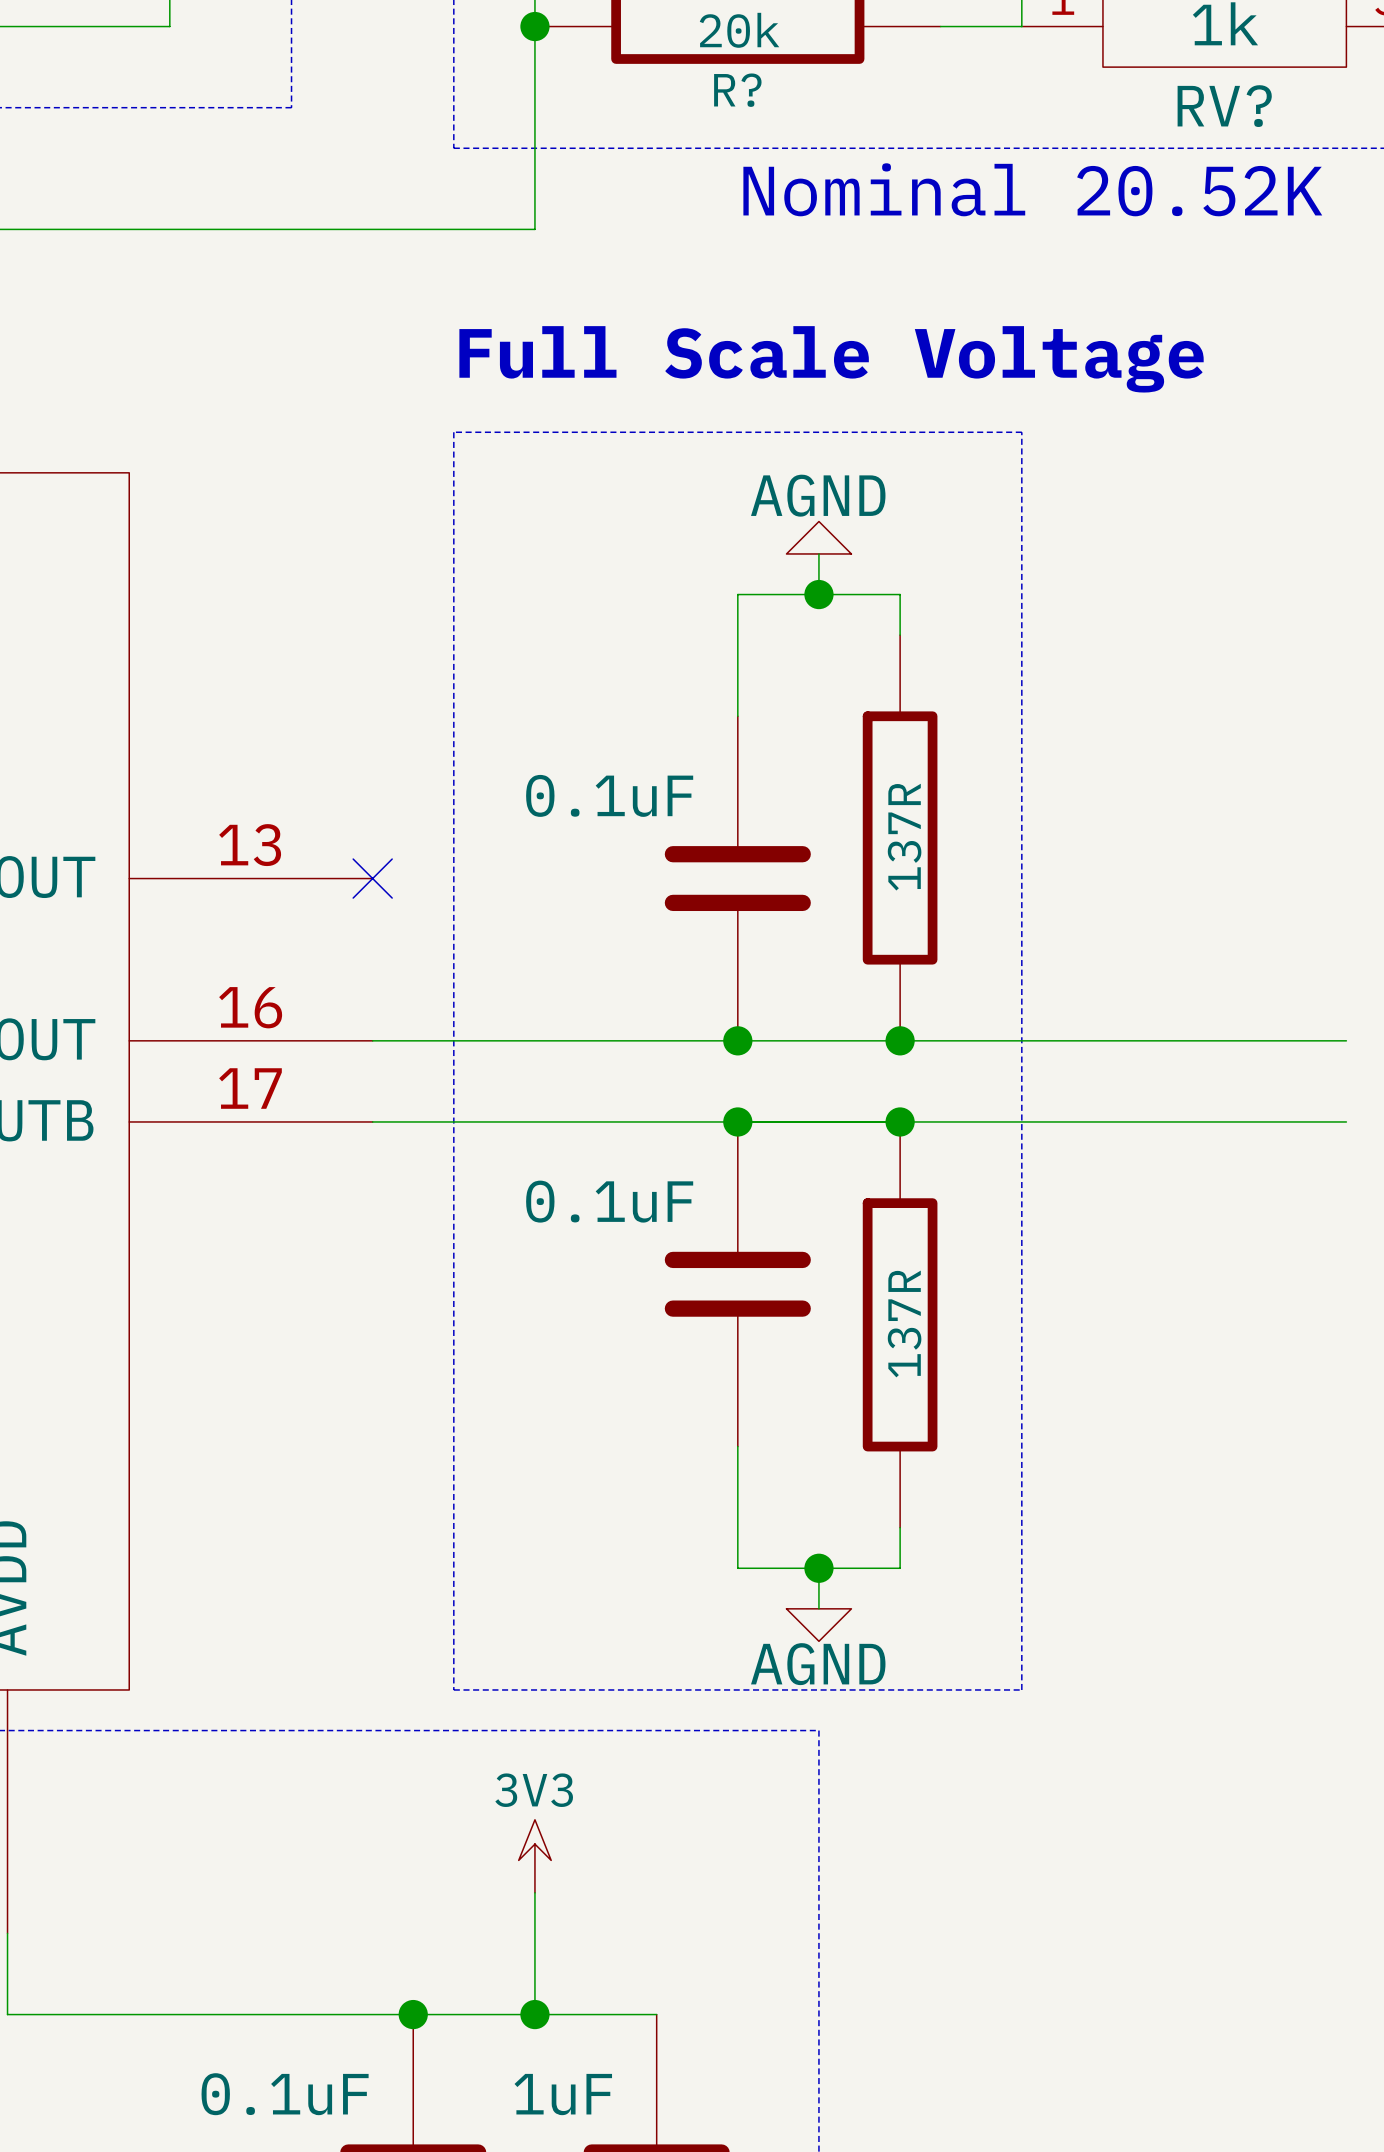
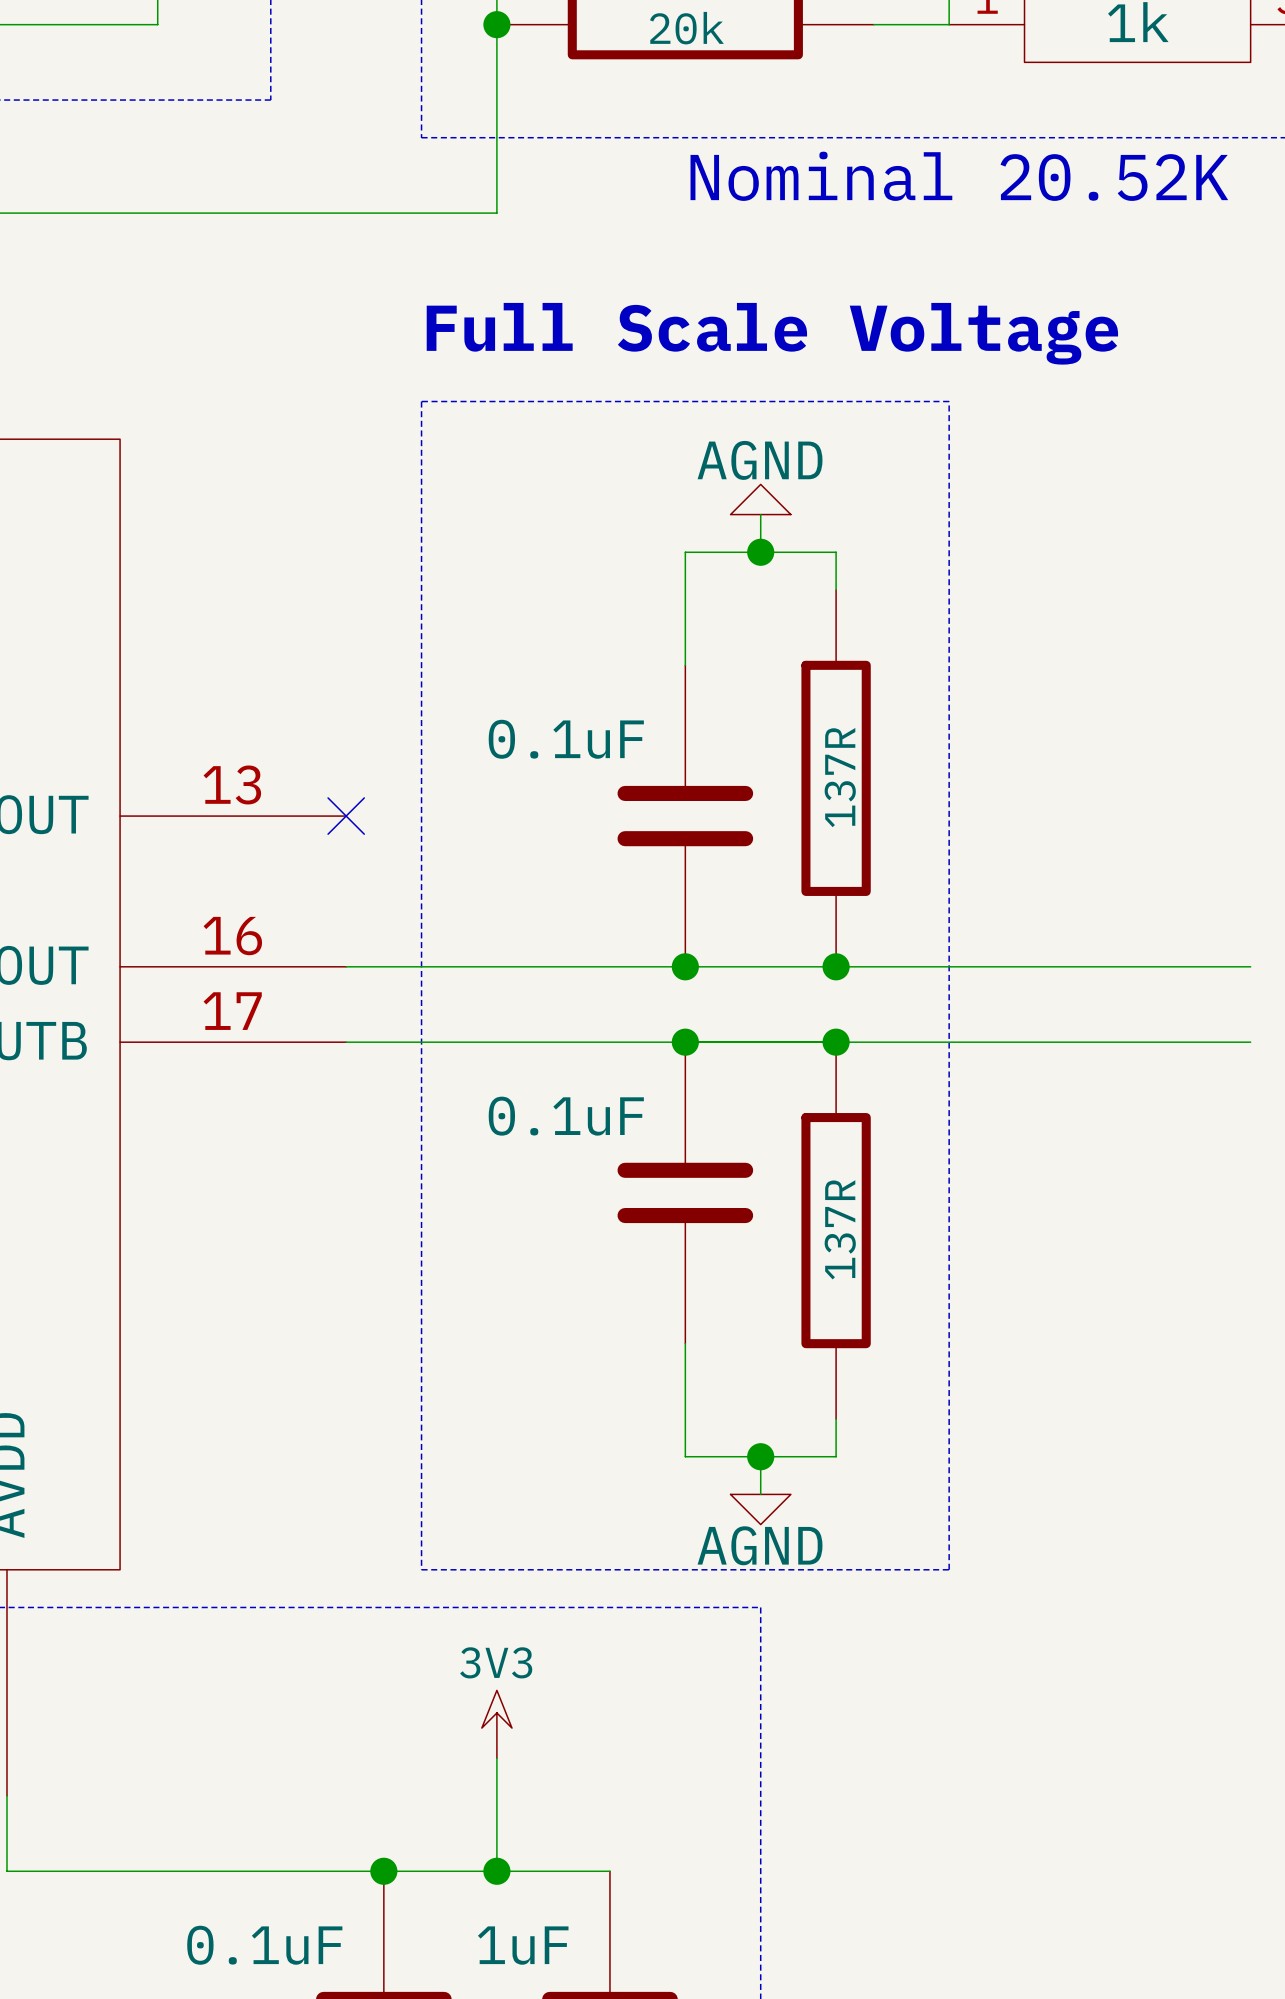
R? name: R? (737, 90) -> none
RV? name: RV? (1224, 106) -> none

